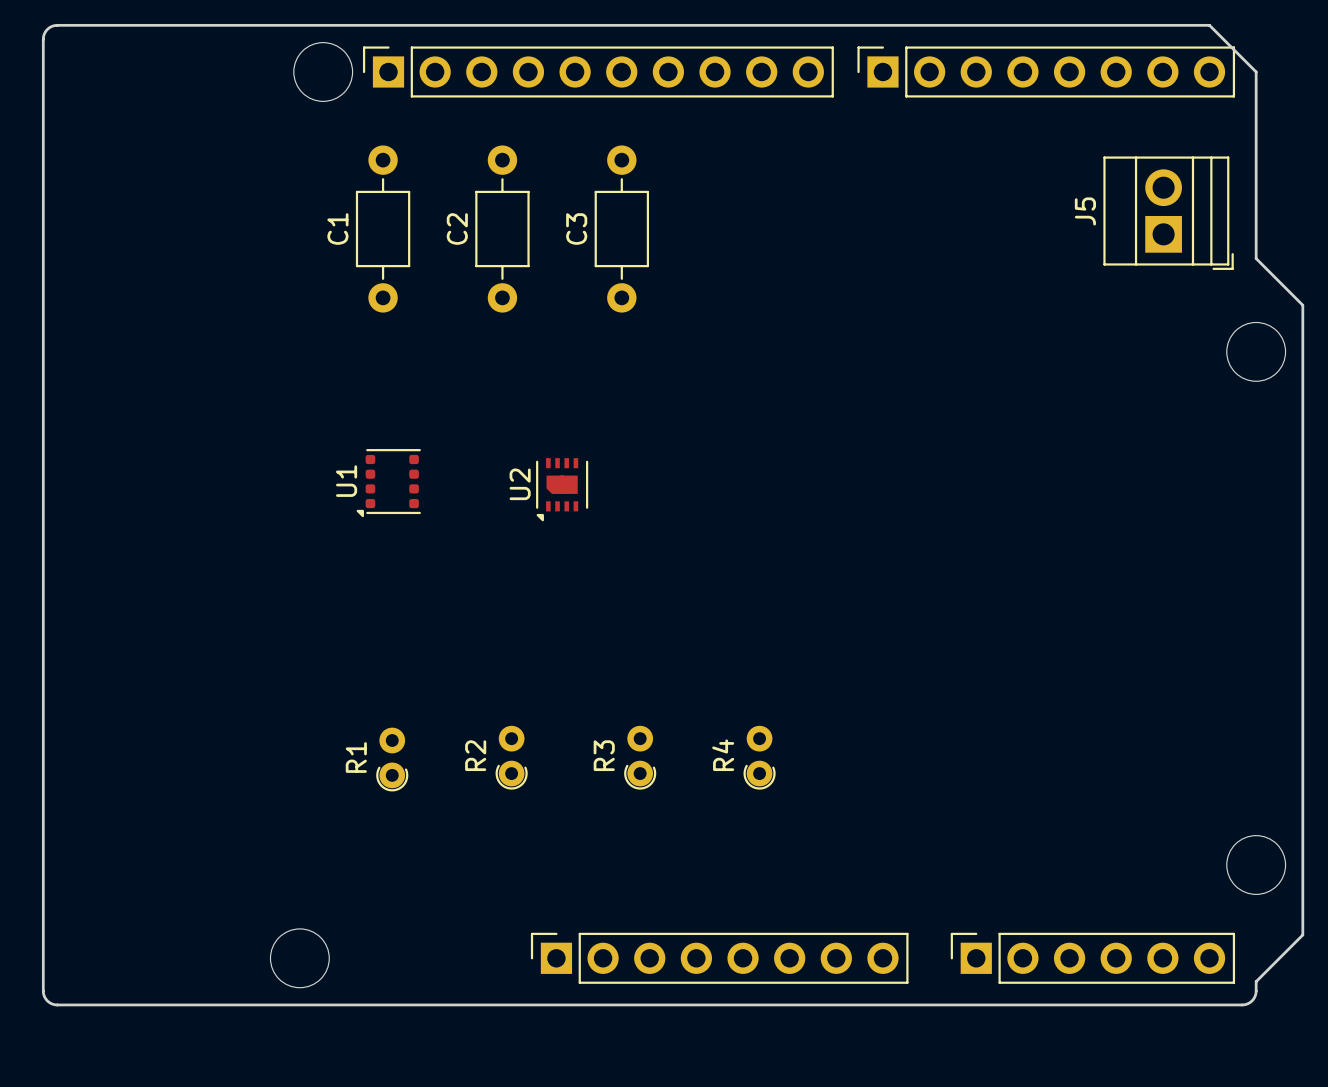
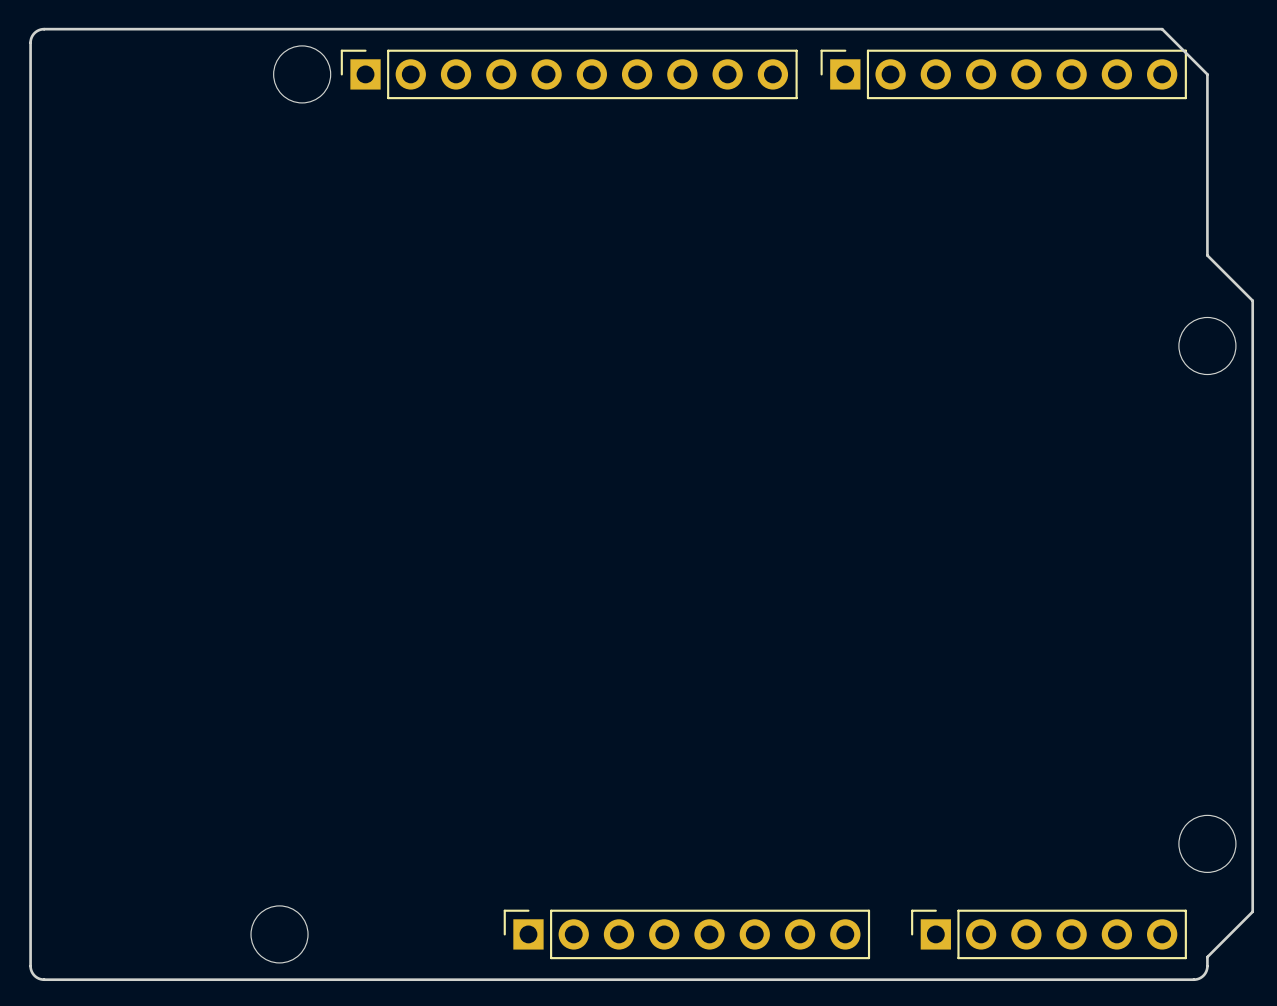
J5: (1168, 213) -> none
C1: (383, 229) -> none
C2: (502, 229) -> none
C3: (621, 229) -> none
U1: (388, 483) -> none
U2: (562, 489) -> none
R2: (511, 757) -> none
R3: (640, 757) -> none
R4: (759, 757) -> none
R1: (392, 759) -> none

